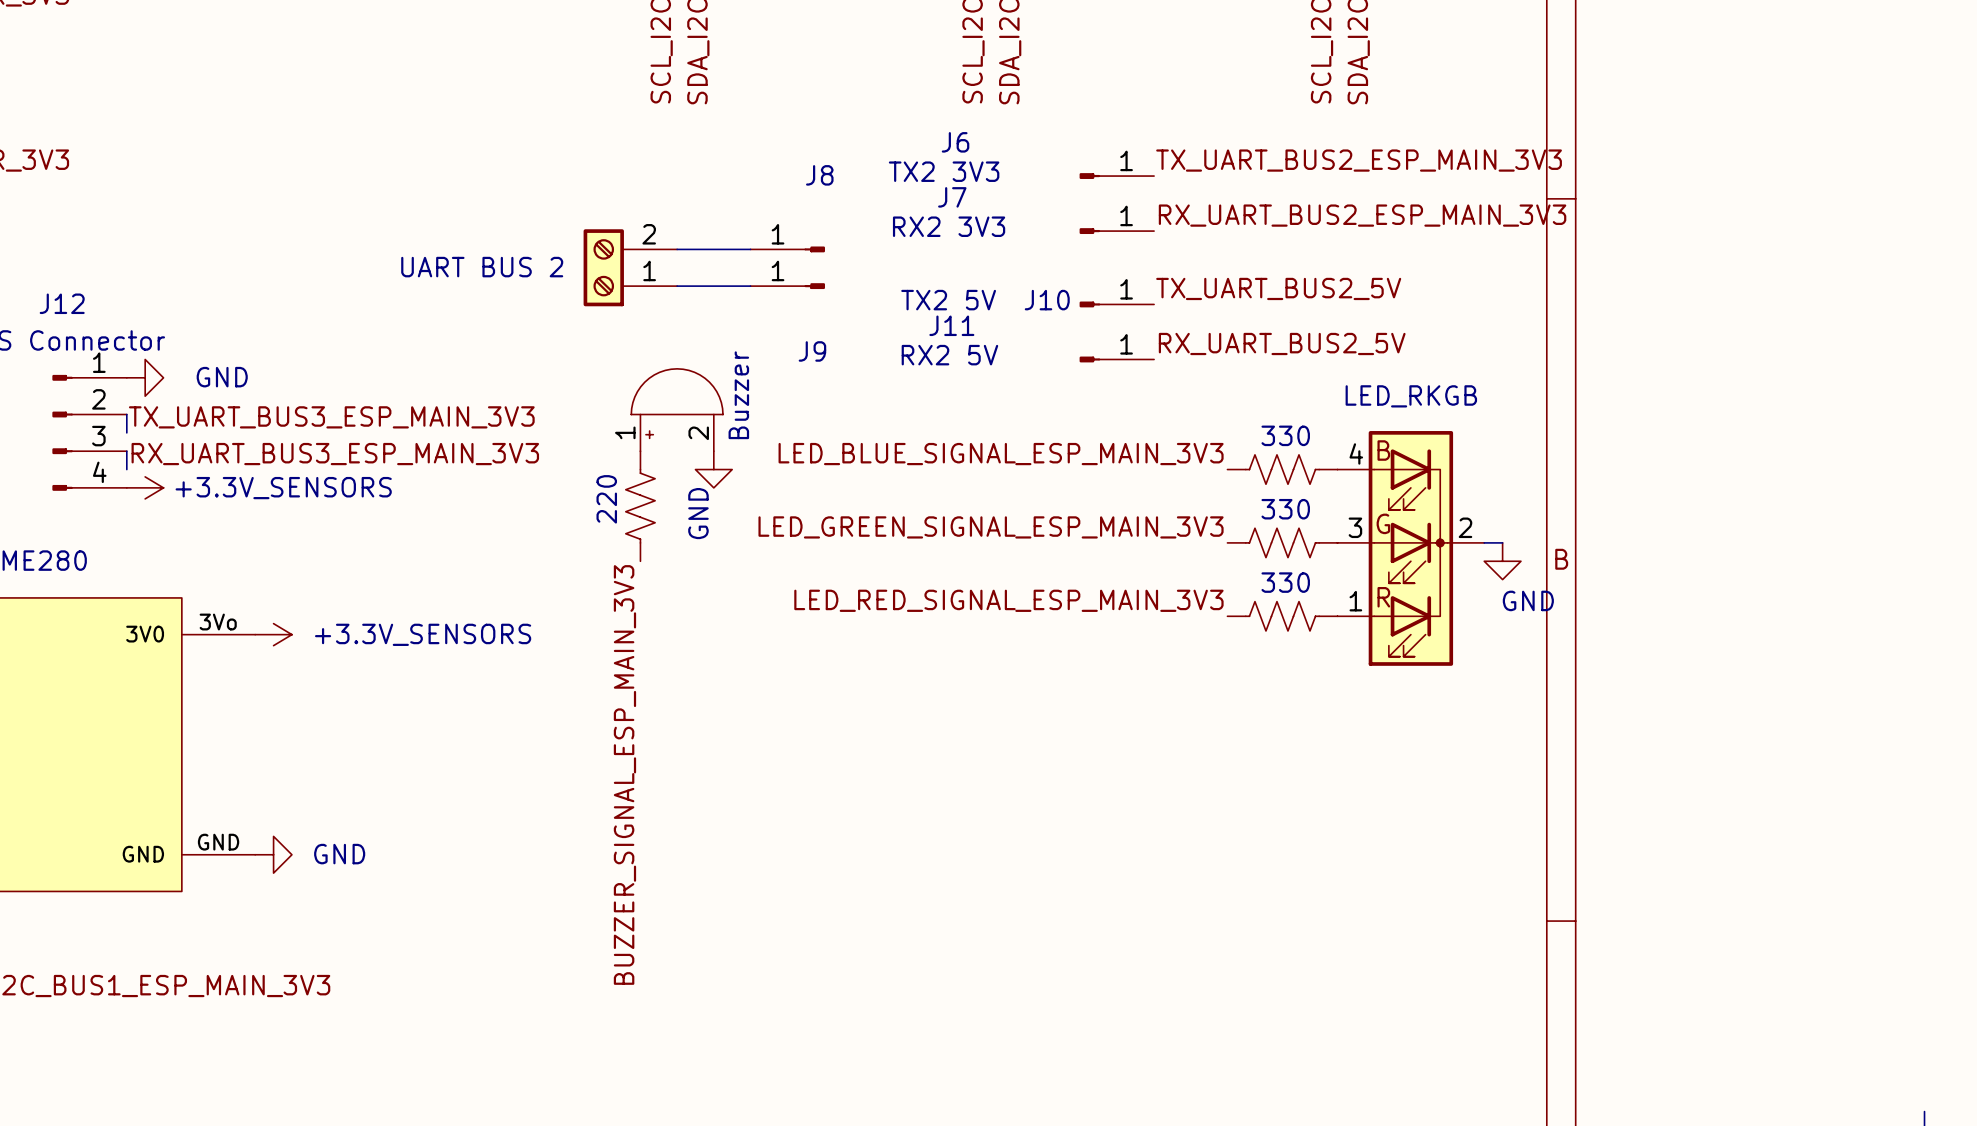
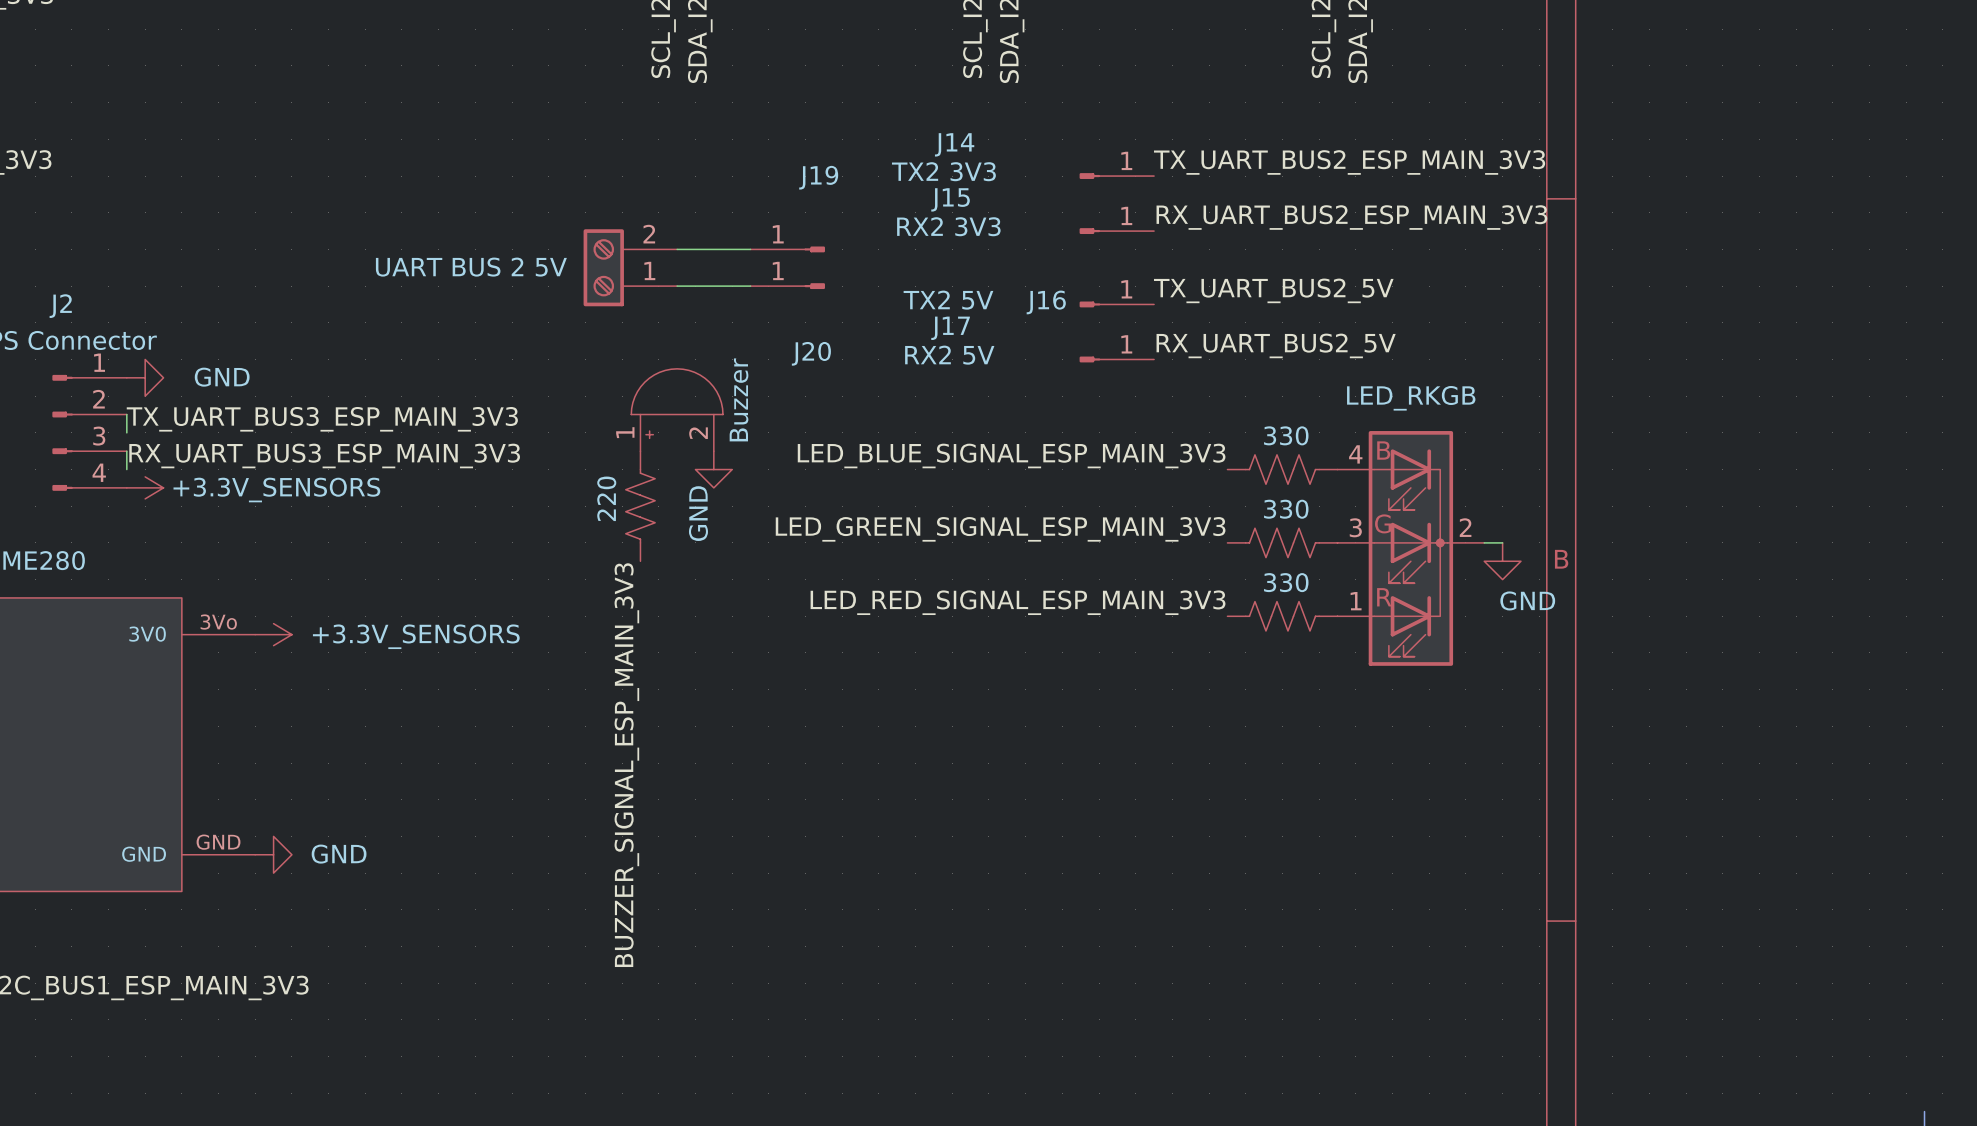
J6 name: J6 (955, 142) -> J14 (954, 144)
J8 name: J8 (819, 175) -> J19 (818, 177)
J7 name: J7 (952, 197) -> J15 (950, 199)
part value: UART BUS 2 (482, 267) -> UART BUS 2 5V (471, 267)
J10 name: J10 (1047, 300) -> J16 (1046, 302)
J12 name: J12 (62, 303) -> J2 (60, 306)
J11 name: J11 (951, 325) -> J17 (950, 328)
J9 name: J9 (812, 351) -> J20 (811, 353)

